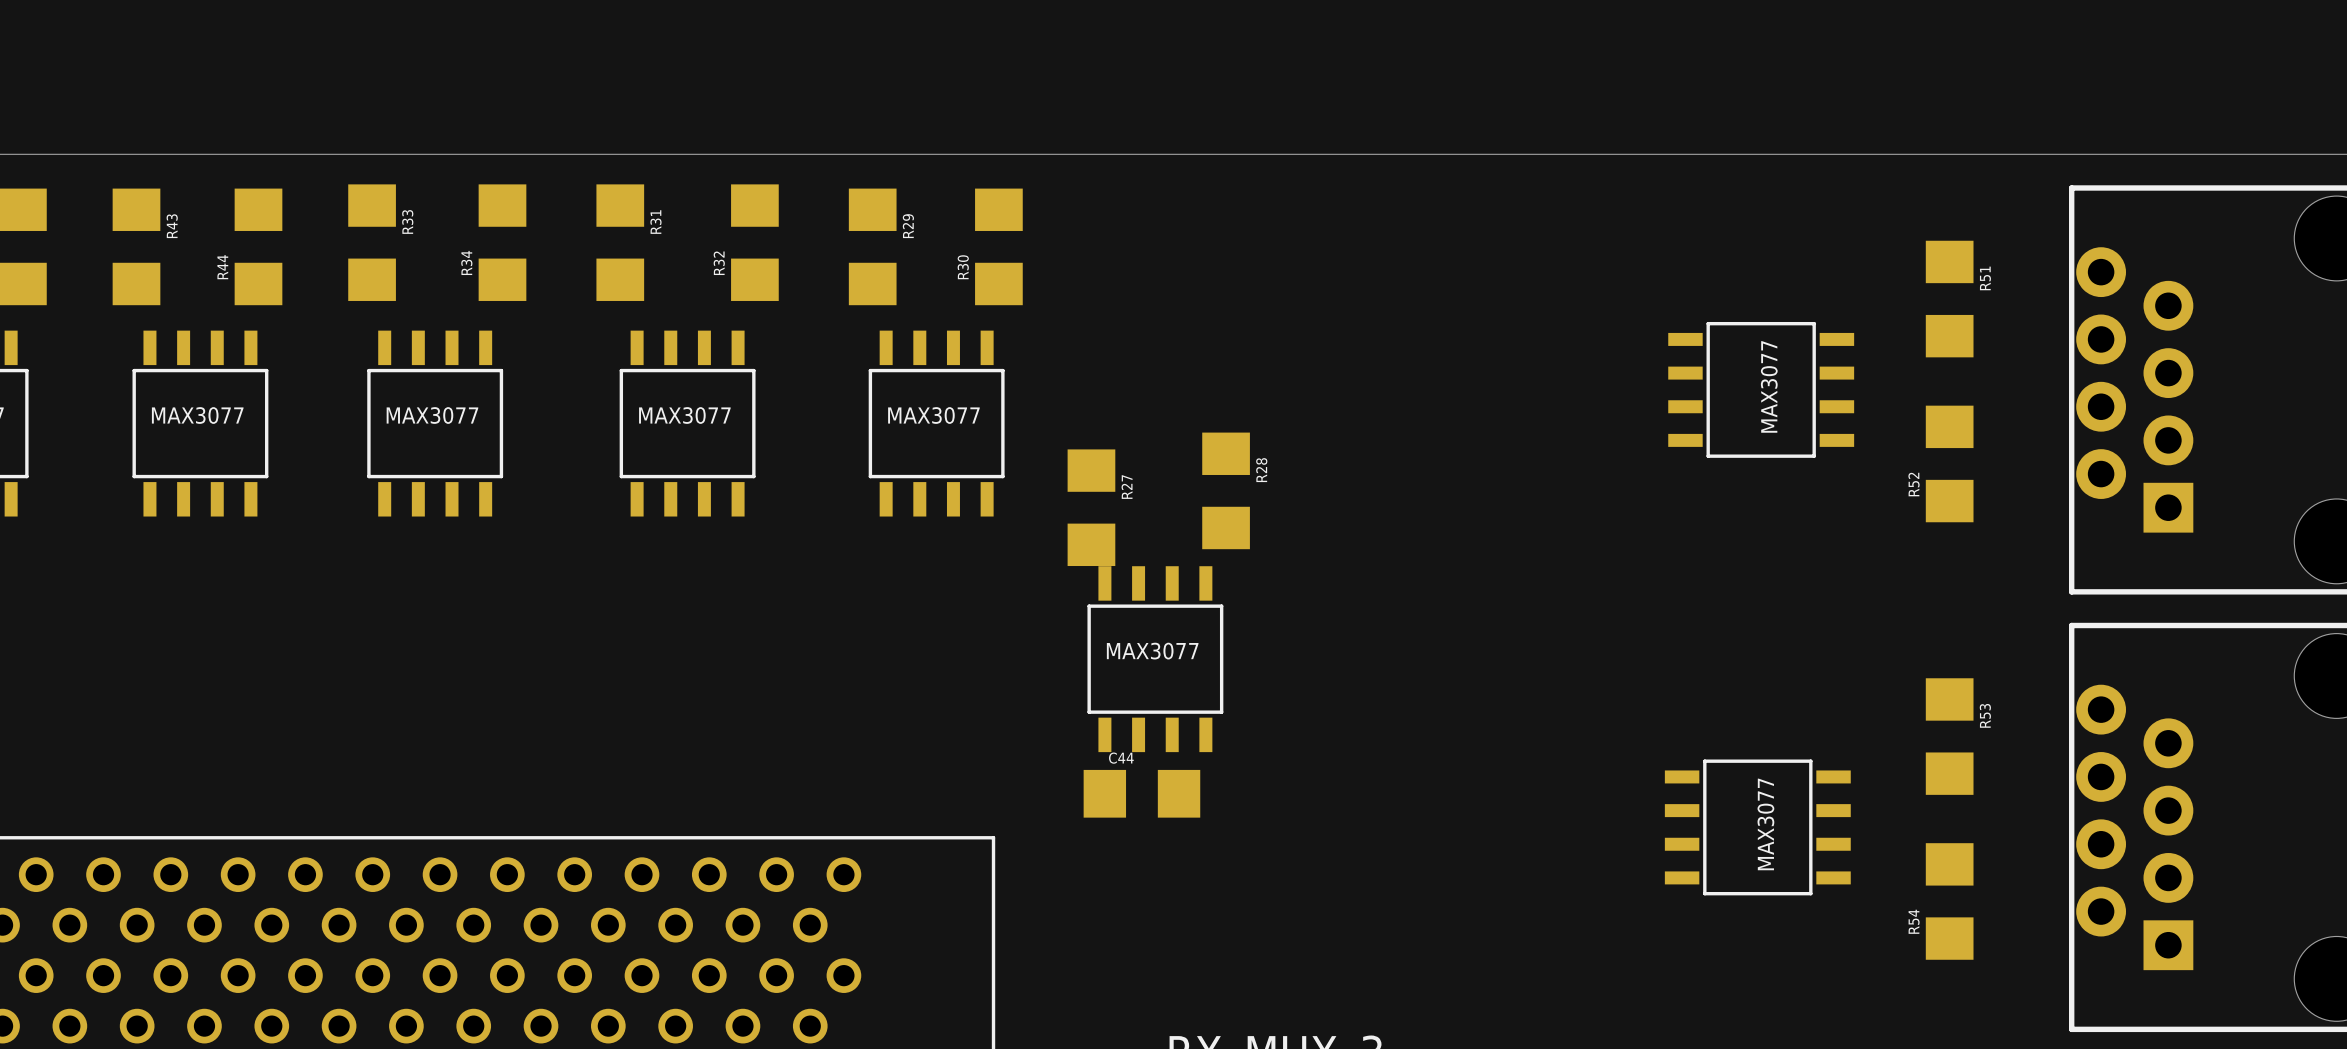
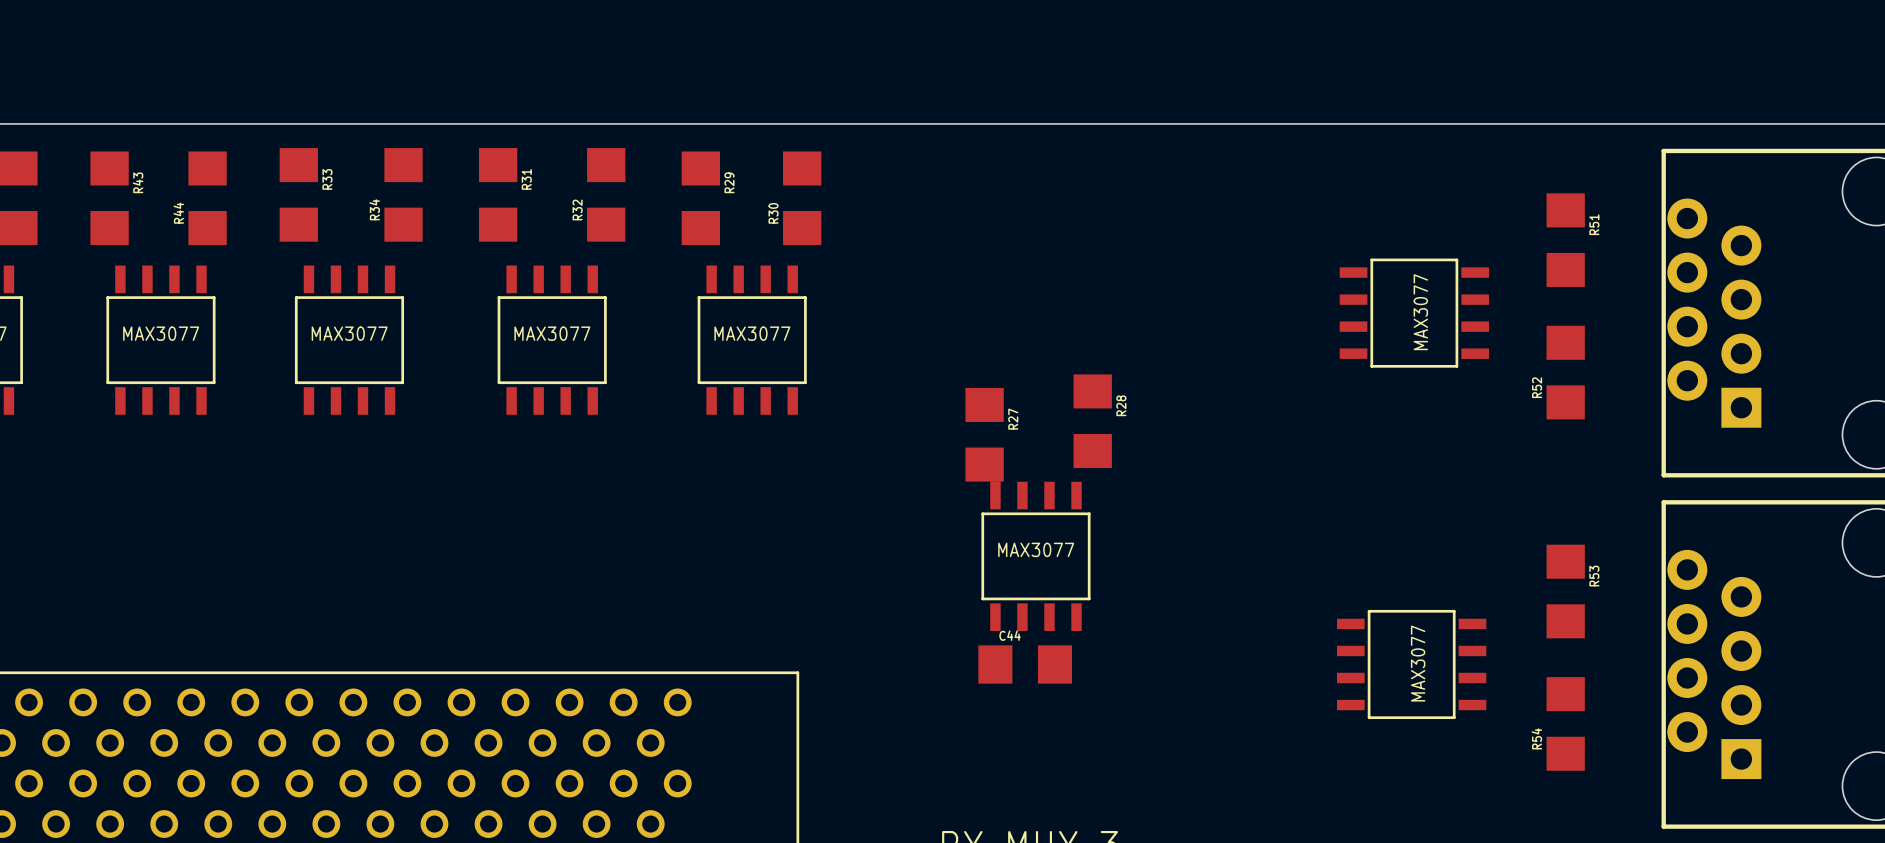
R28 position: (1226, 490) -> (1092, 421)
R27 position: (1091, 507) -> (984, 434)
part position: (1155, 659) -> (1035, 556)
C44 position: (1141, 793) -> (1025, 664)

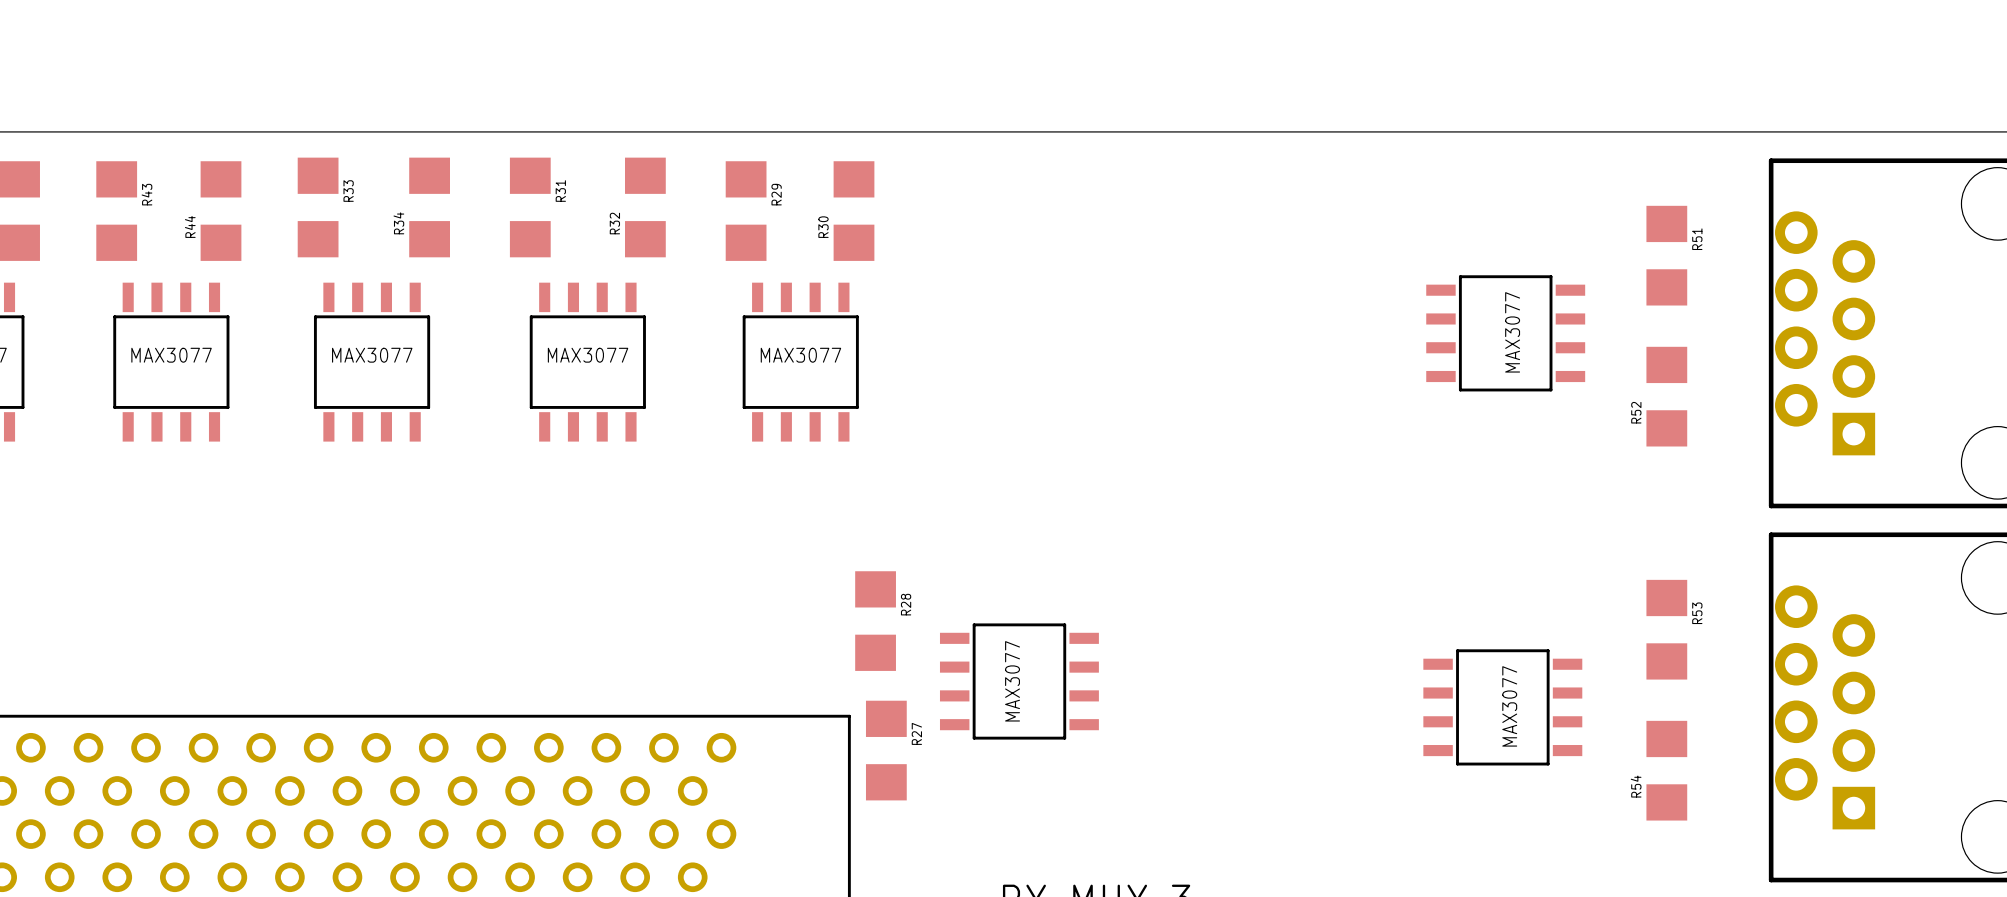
R28 position: (1092, 421) -> (875, 621)
R27 position: (984, 434) -> (886, 750)
part rotation: 0° (1035, 556) -> 90° counterclockwise (1019, 681)
part position: (1035, 556) -> (1019, 681)
C44: (1025, 664) -> none

